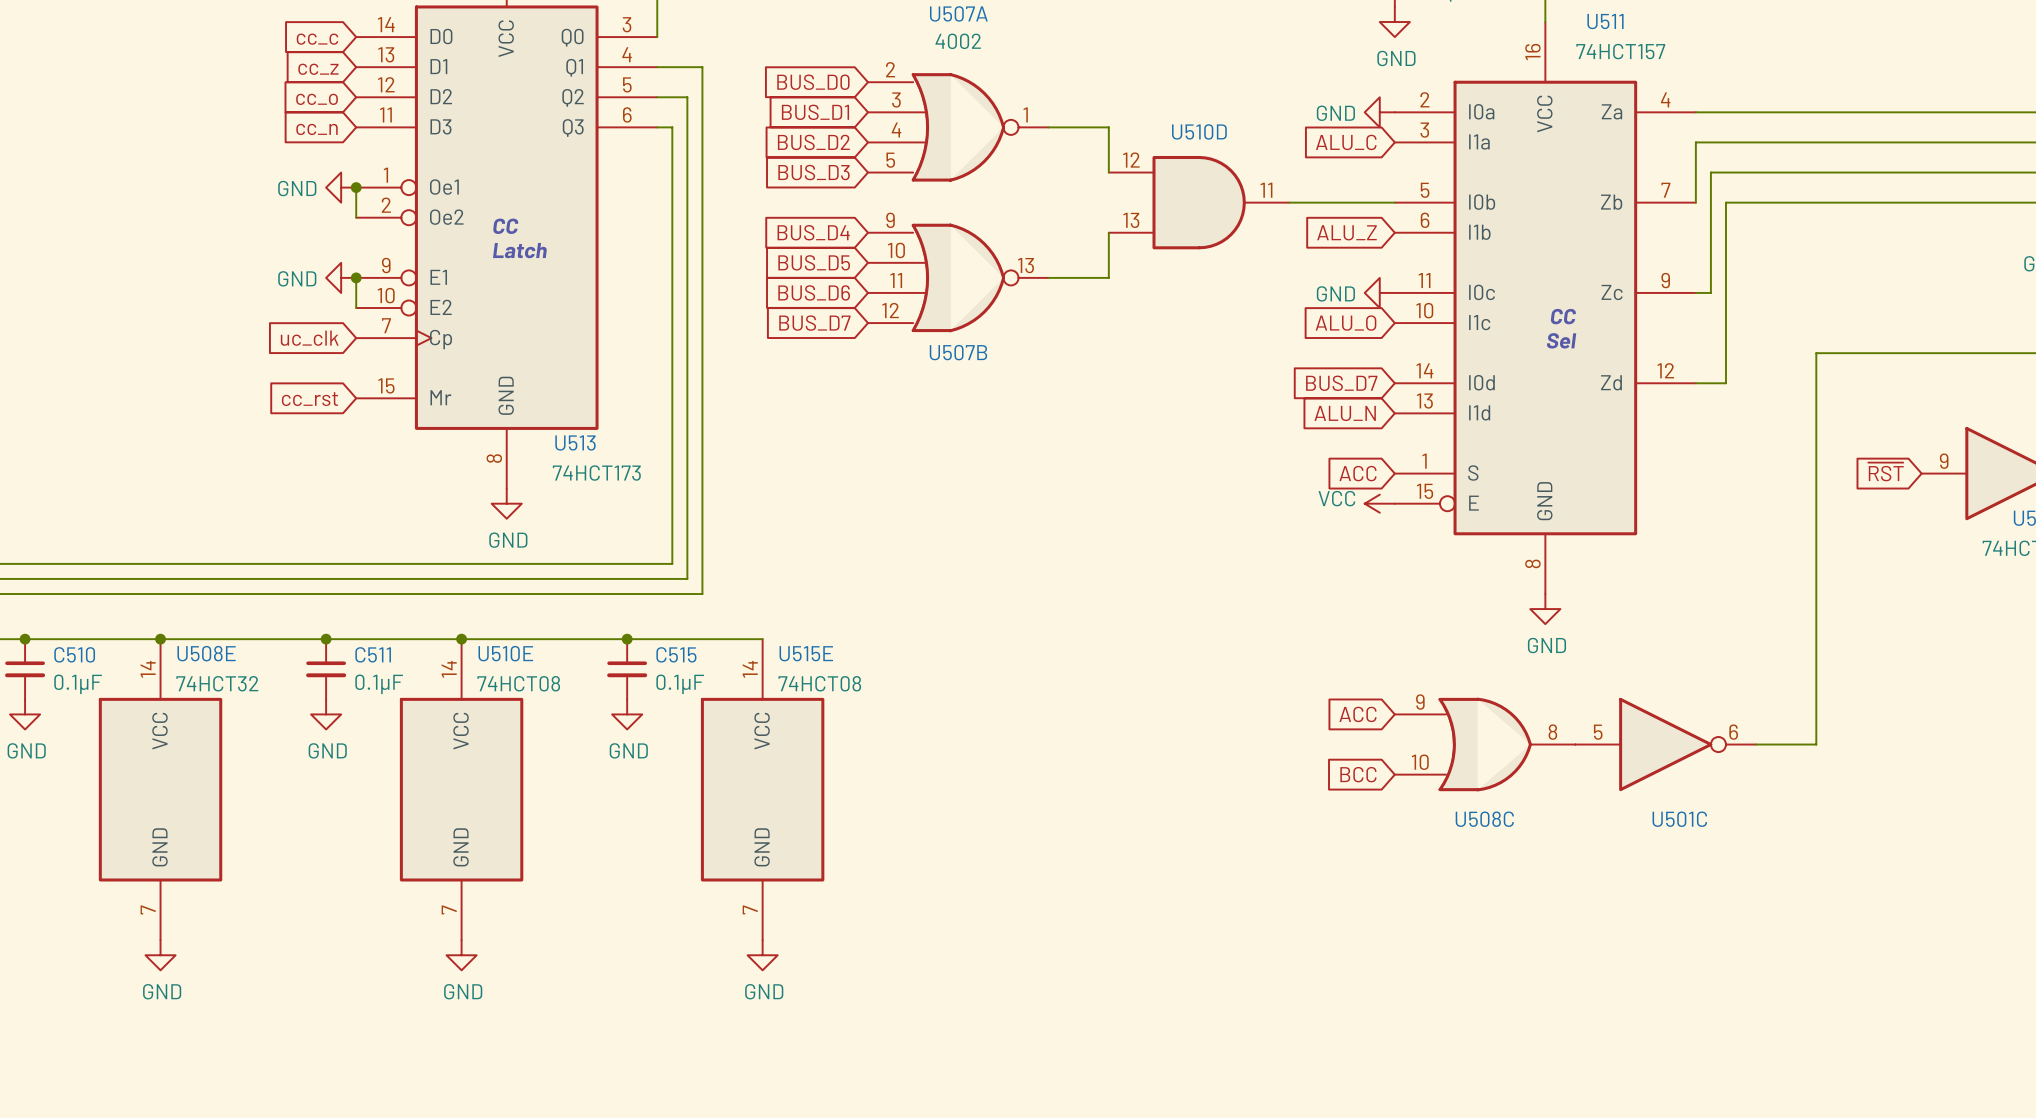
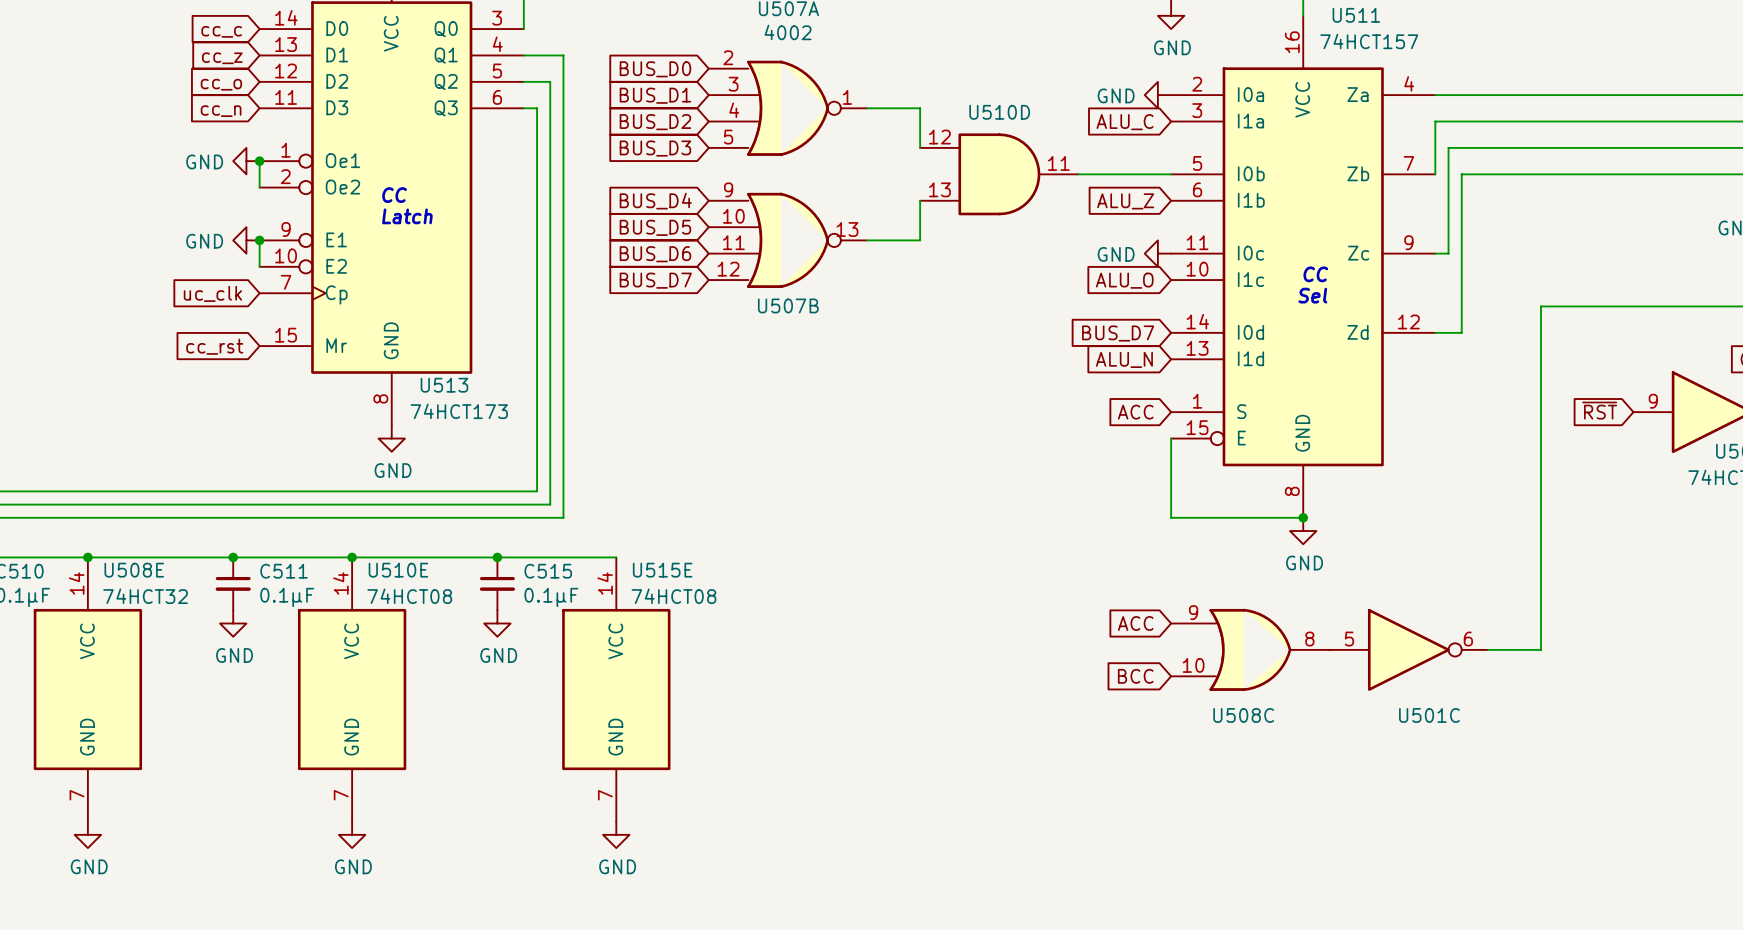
power symbol: VCC (1379, 503) -> none
wire: none -> (1171, 438) (1171, 517) (1303, 517)
junction: none -> (1303, 517)

